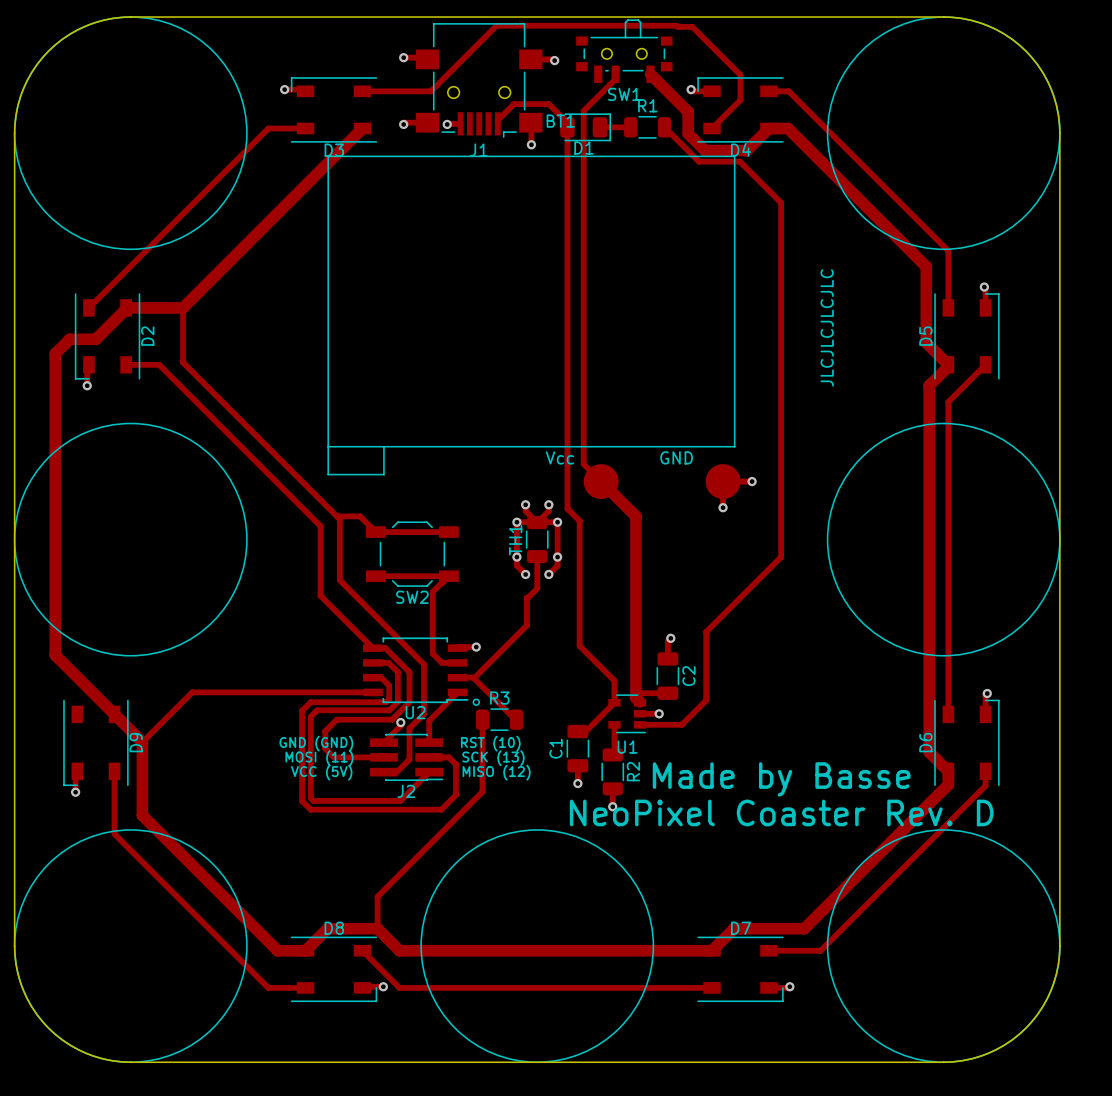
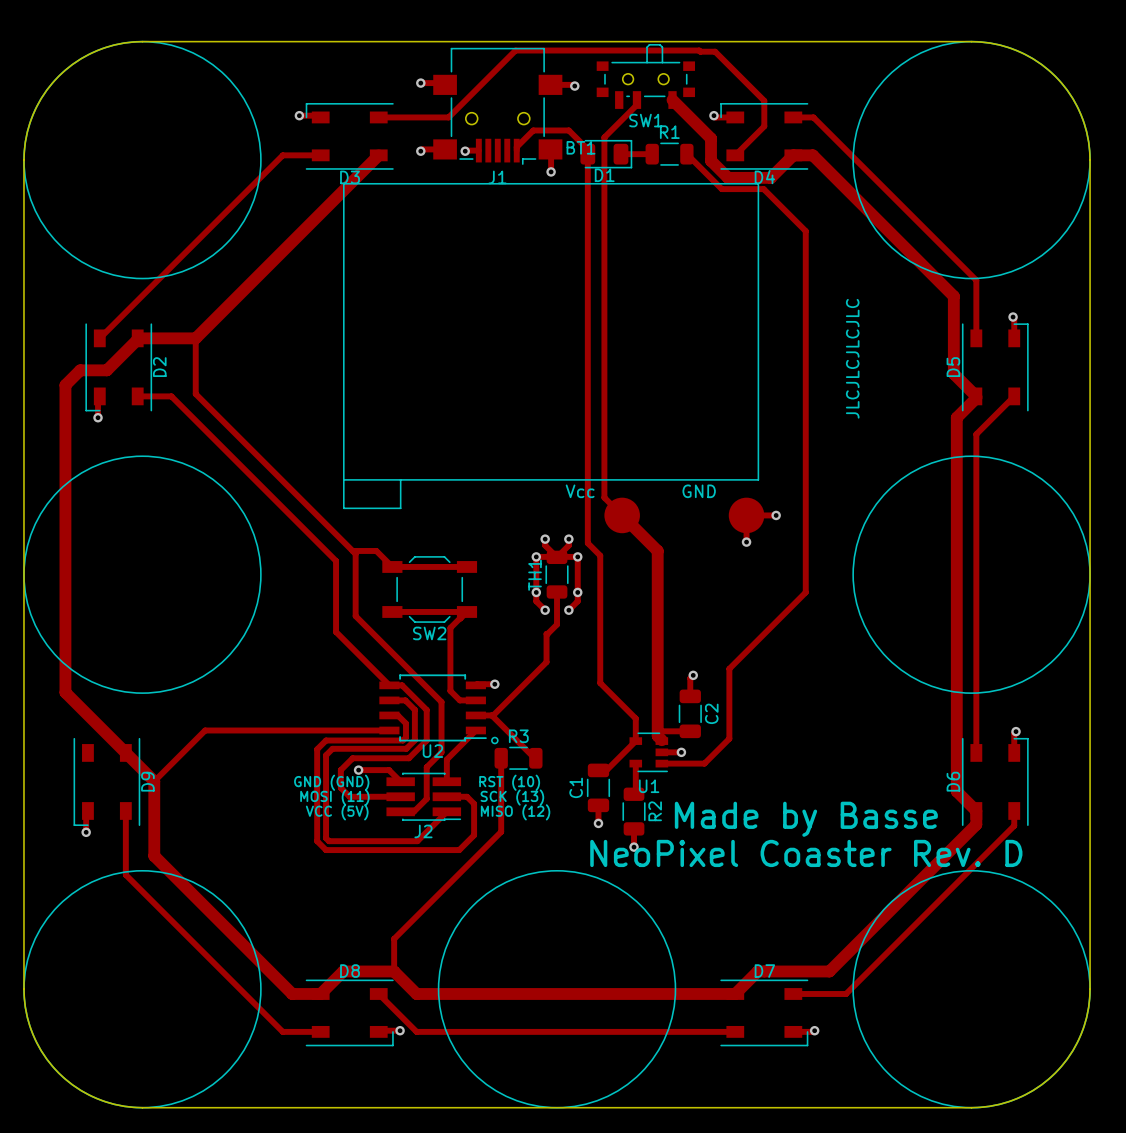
track: (400, 722) (400, 725) (383, 742) -> (358, 770) (389, 770) (400, 781)
via position: (400, 722) -> (358, 770)

